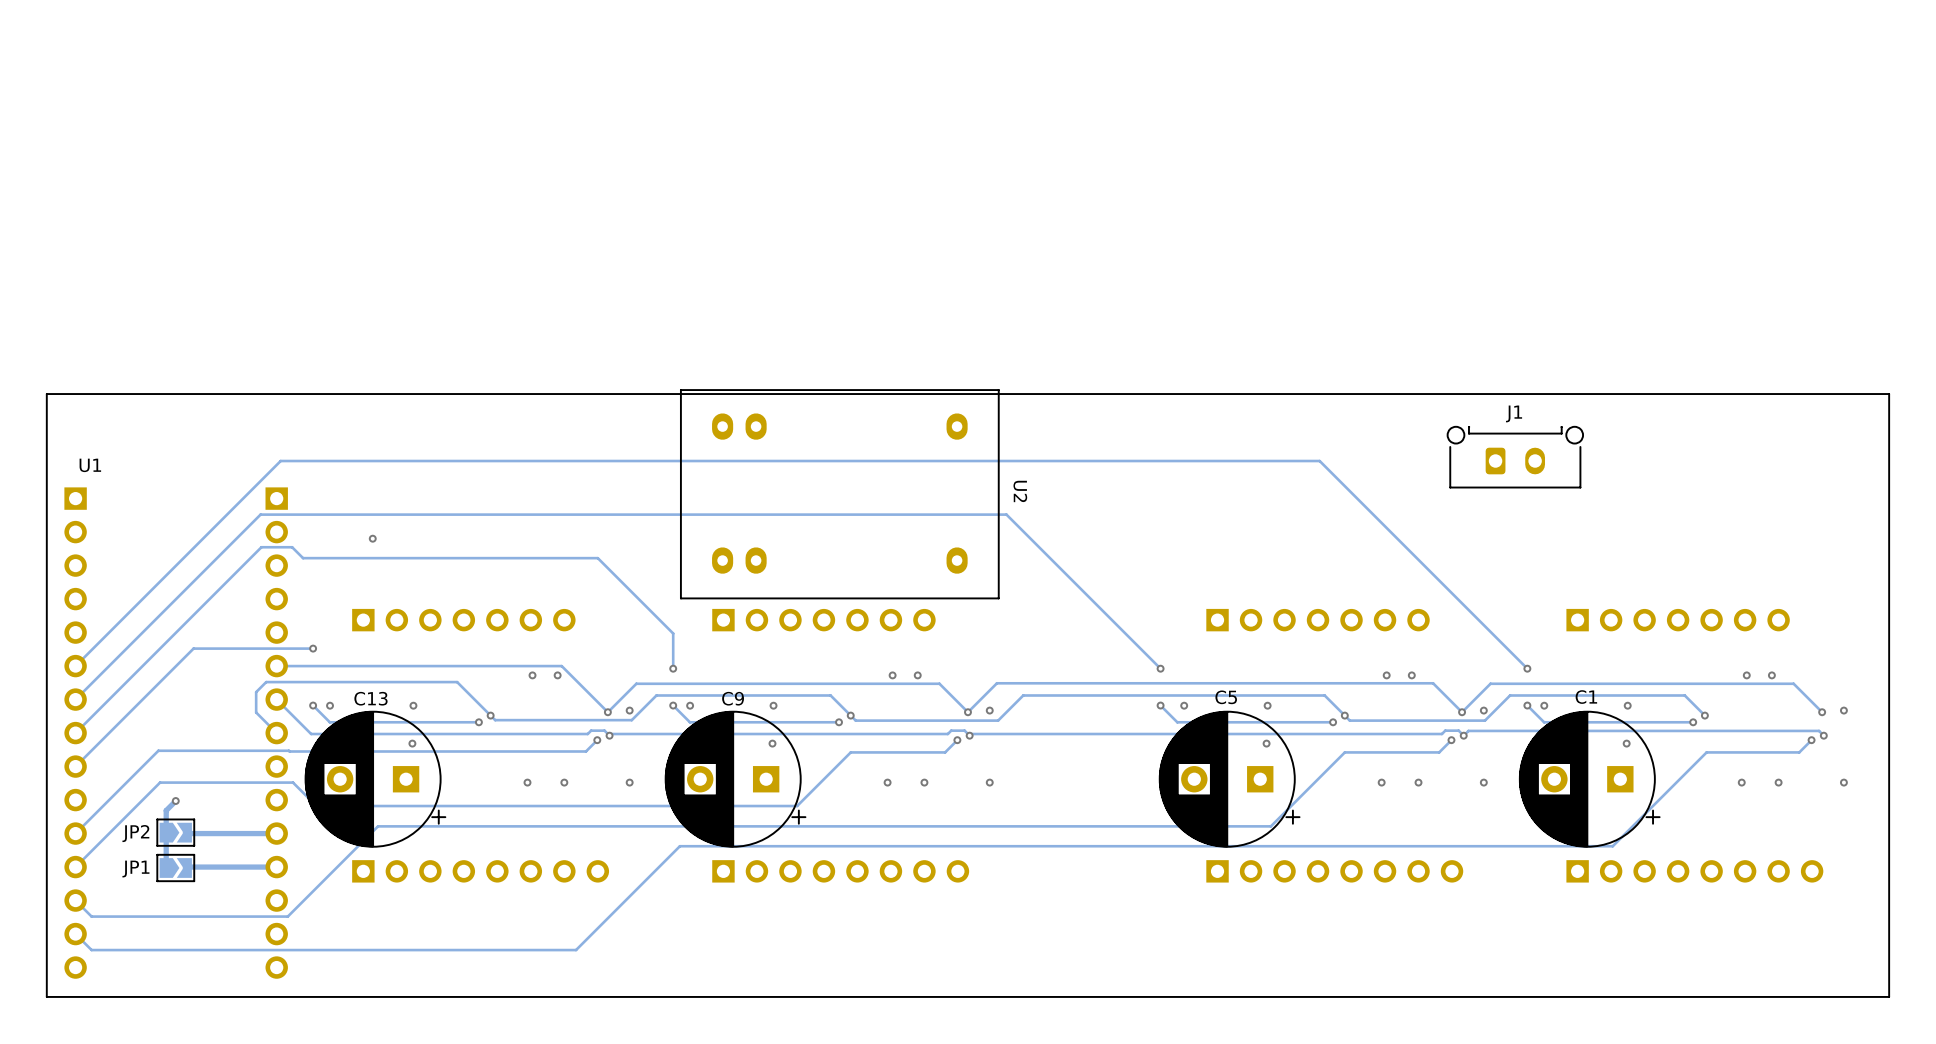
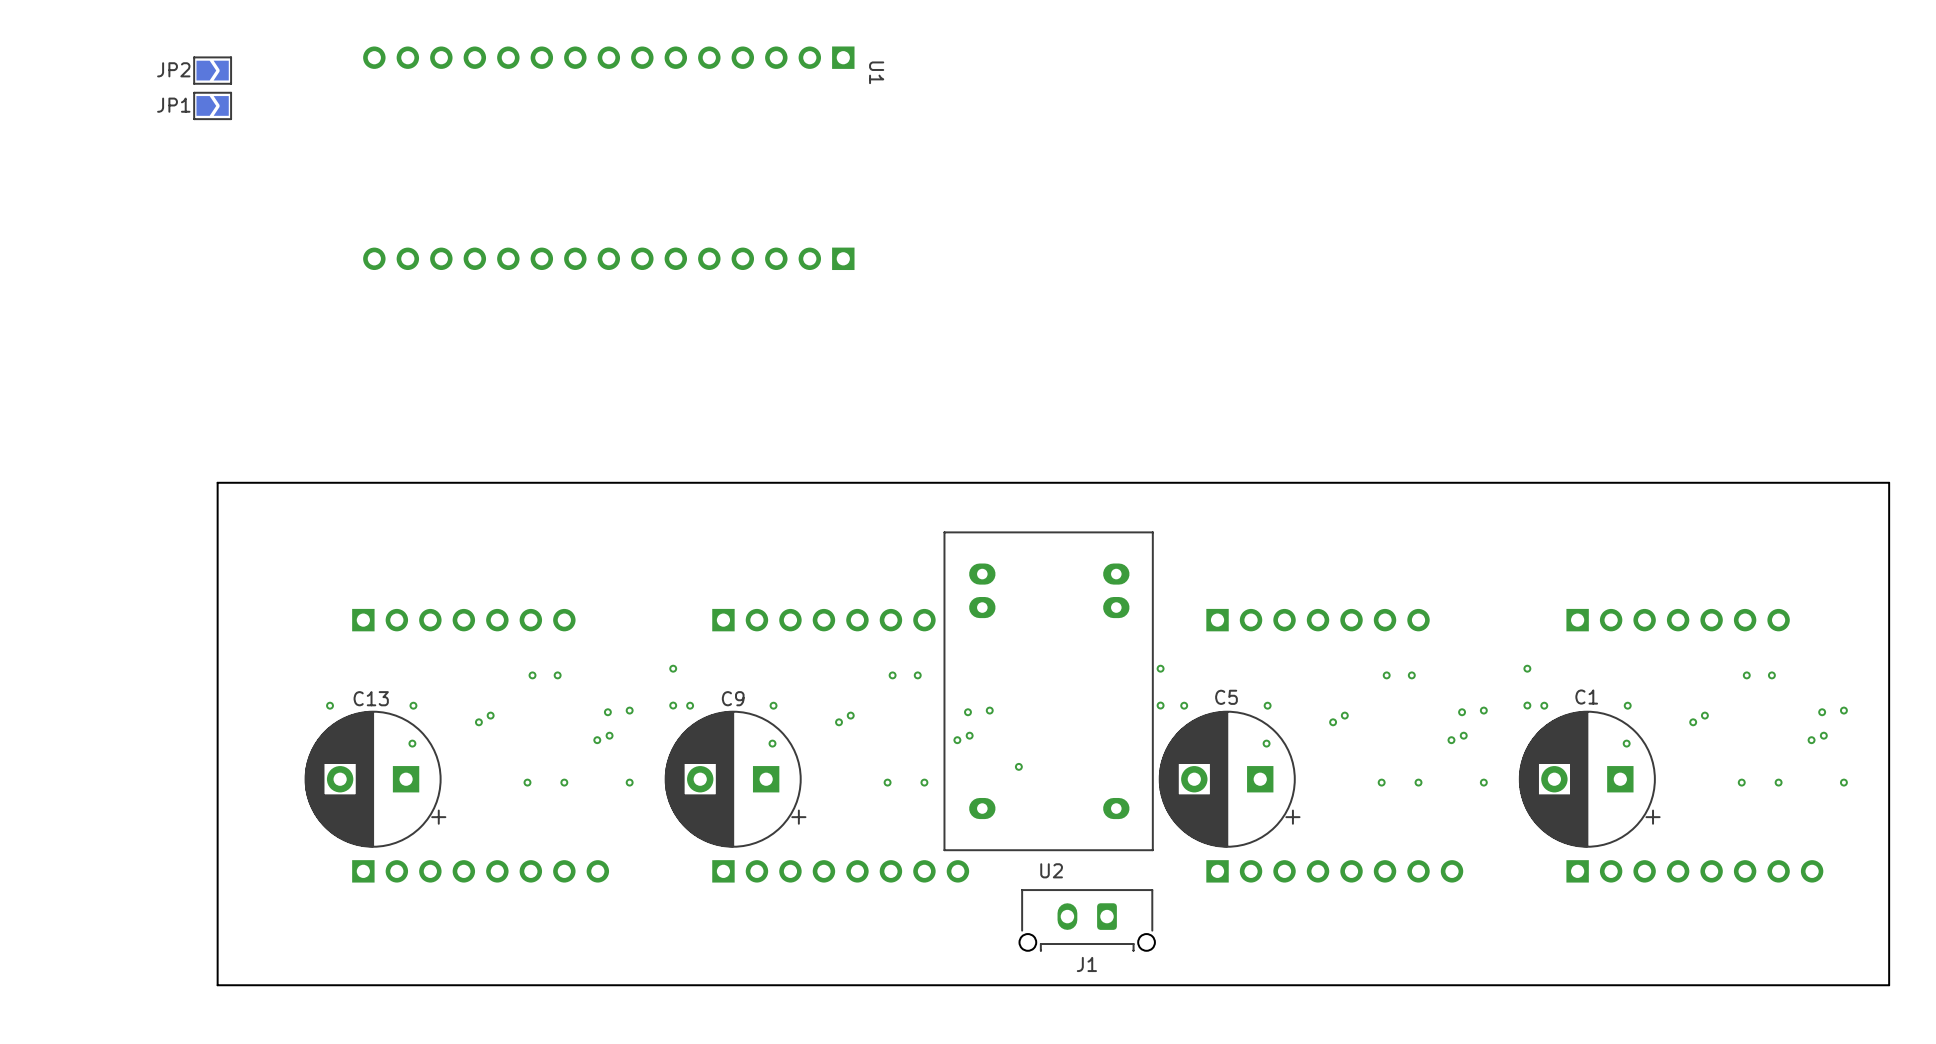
J1 rotation: 0° (1515, 457) -> 180° (1087, 920)
J1 position: (1515, 457) -> (1087, 920)
board edge: (1889, 482) (1889, 394) (46, 394) (46, 996) (1889, 996) (1889, 985) -> (1889, 482) (217, 482) (217, 985) (1889, 985)
U2 rotation: 0° (839, 494) -> 90° clockwise (1048, 691)
U2 position: (839, 494) -> (1048, 691)
via: (372, 538) -> none
track: (313, 648) (193, 648) (75, 766) -> none
via: (313, 648) -> none
track: (75, 666) (280, 461) (1319, 461) (1527, 668) -> none
track: (276, 666) (561, 666) (607, 712) (636, 683) (939, 683) (967, 712) (996, 683) (1433, 683) (1462, 712) (1490, 683) (1793, 683) (1822, 712) -> none
track: (673, 668) (673, 633) (597, 558) (303, 558) (292, 547) (261, 547) (75, 733) -> none
track: (1160, 668) (1006, 514) (260, 514) (75, 699) -> none
track: (276, 699) (311, 734) (587, 734) (591, 730) (604, 730) (609, 735) (611, 734) (947, 734) (951, 730) (964, 730) (969, 735) (971, 734) (1441, 734) (1445, 730) (1458, 730) (1463, 735) (1468, 730) (1819, 730) (1823, 735) -> none
track: (313, 705) (329, 722) (478, 722) -> none
via: (313, 705) -> none
track: (673, 705) (689, 722) (839, 722) -> none
track: (1160, 705) (1177, 722) (1333, 722) -> none
track: (1527, 705) (1544, 722) (1693, 722) -> none
track: (1704, 715) (1684, 695) (1510, 695) (1484, 720) (1349, 720) (1324, 695) (1023, 695) (998, 720) (855, 720) (830, 695) (656, 695) (631, 720) (495, 720) (457, 682) (266, 682) (256, 692) (256, 712) (276, 733) -> none
U1 rotation: 0° (176, 733) -> 90° clockwise (608, 158)
U1 position: (176, 733) -> (608, 158)
track: (597, 740) (585, 751) (158, 750) (75, 833) -> none
track: (957, 740) (945, 752) (850, 752) (797, 806) (316, 806) (293, 782) (160, 782) (75, 867) -> none
track: (1451, 740) (1439, 752) (1344, 752) (1270, 826) (378, 826) (287, 916) (91, 916) (75, 900) -> none
track: (1811, 740) (1799, 752) (1706, 752) (1612, 846) (679, 846) (576, 950) (91, 950) (75, 934) -> none
via position: (989, 782) -> (1018, 766)
track: (175, 801) (166, 810) (166, 868) -> none
via: (175, 801) -> none
JP2 position: (175, 832) -> (212, 70)
track: (185, 832) (276, 833) -> none
track: (276, 867) (185, 868) -> none
JP1 position: (175, 868) -> (212, 105)

